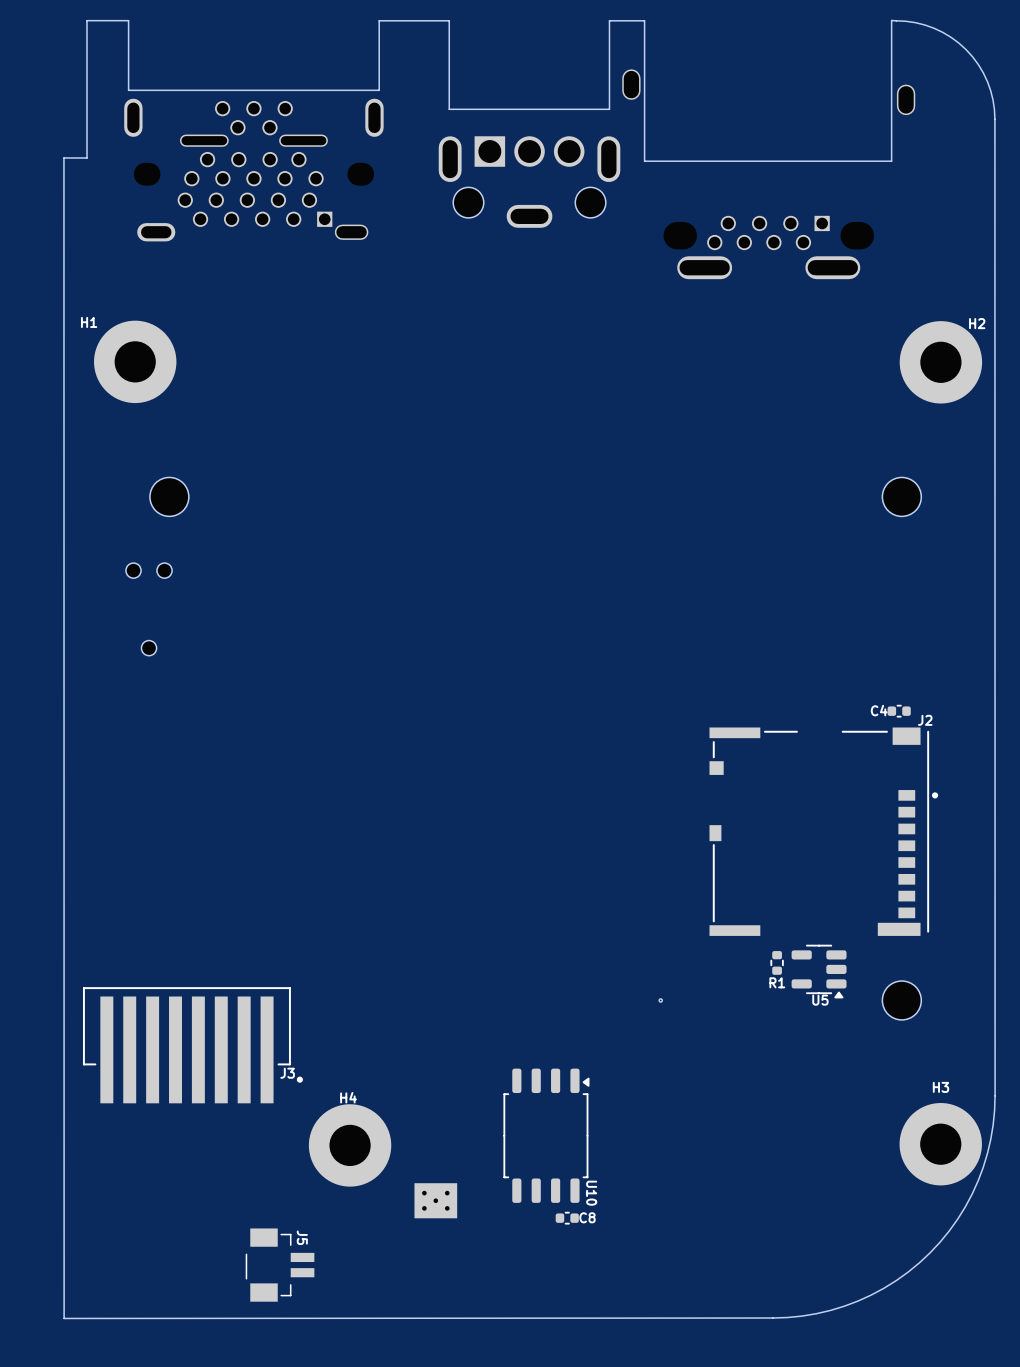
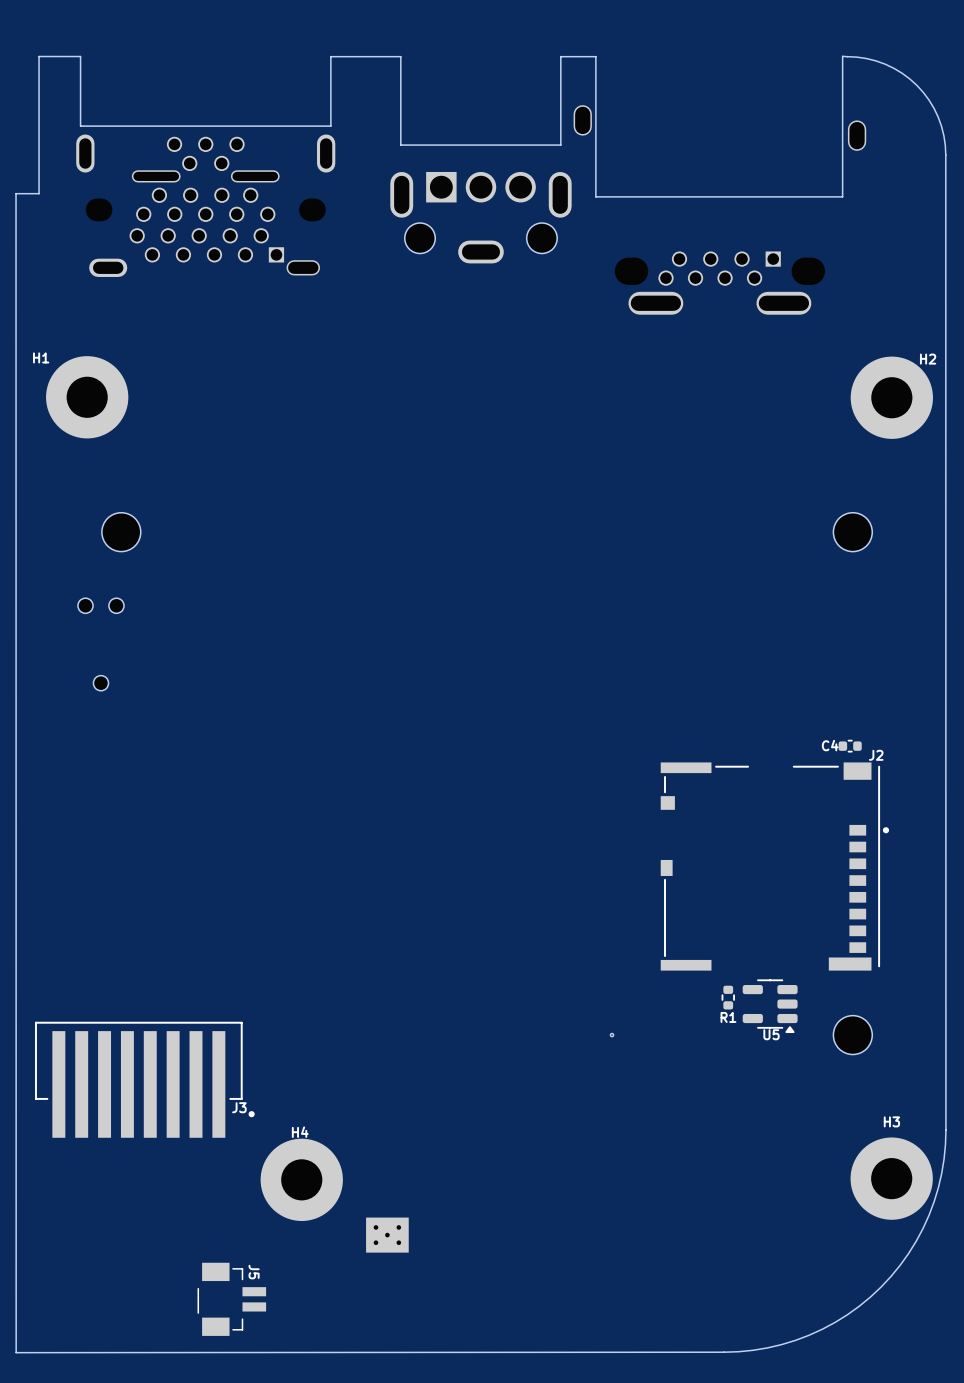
U10: (546, 1135) -> none
C8: (567, 1218) -> none

